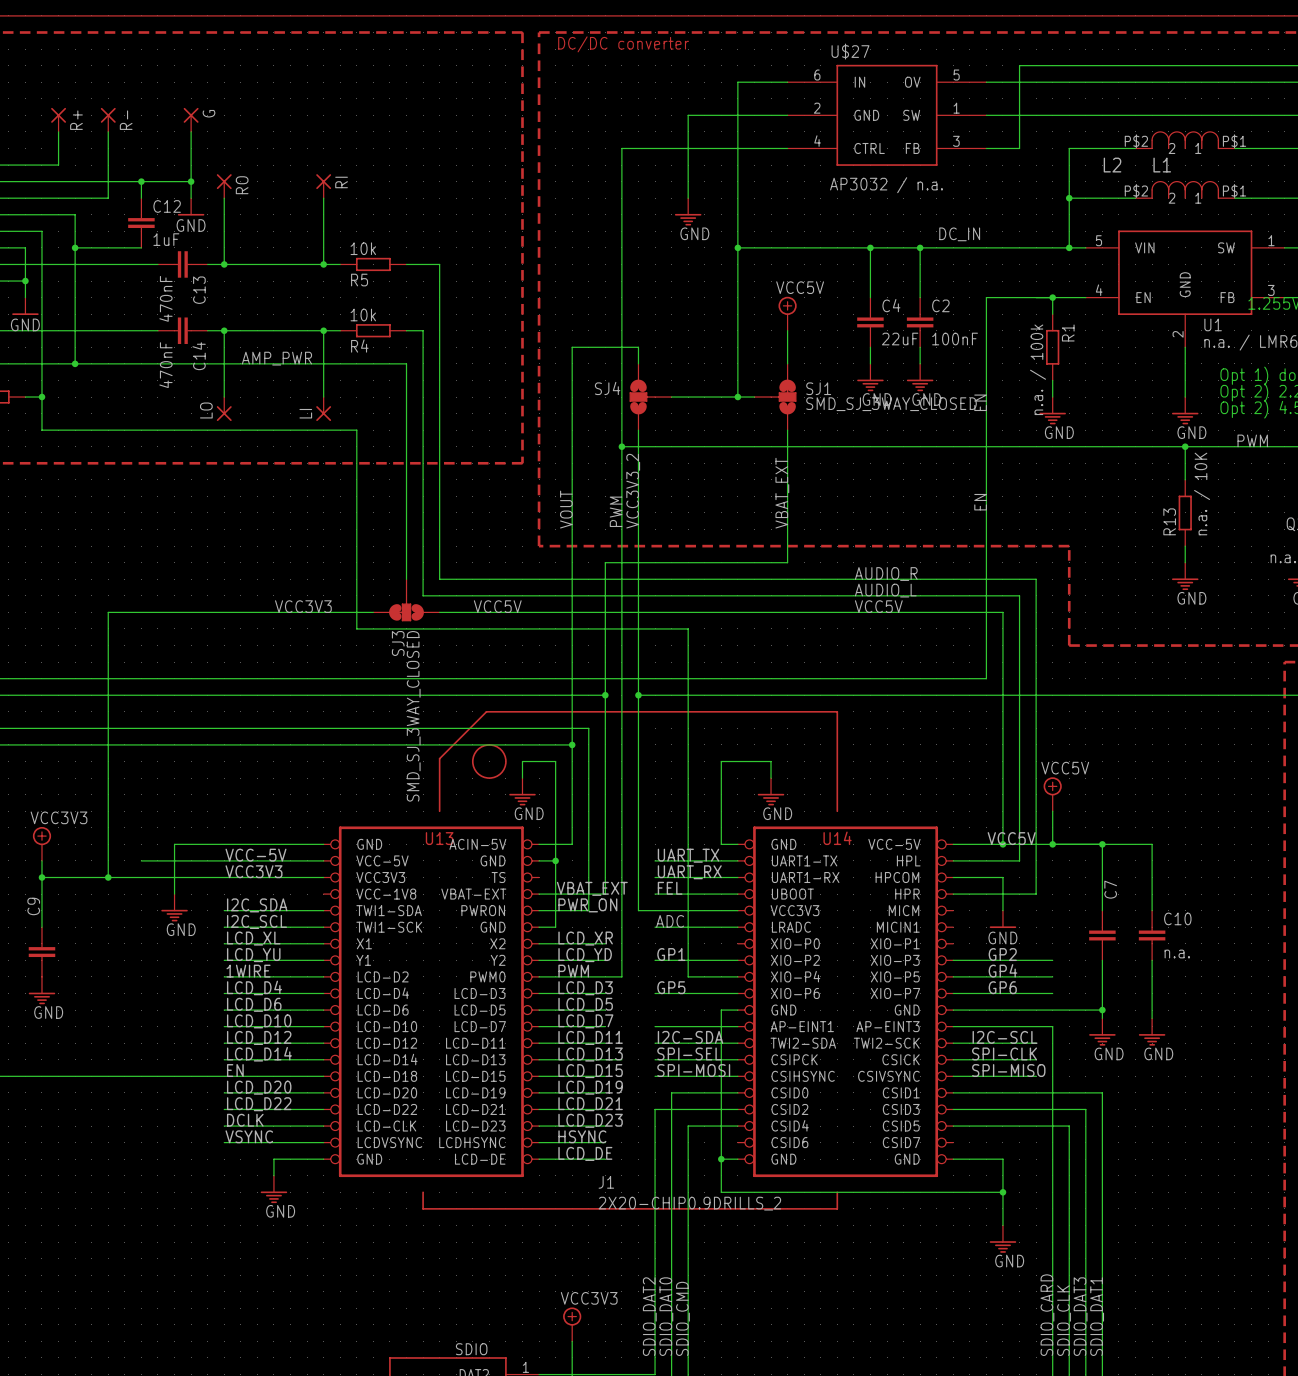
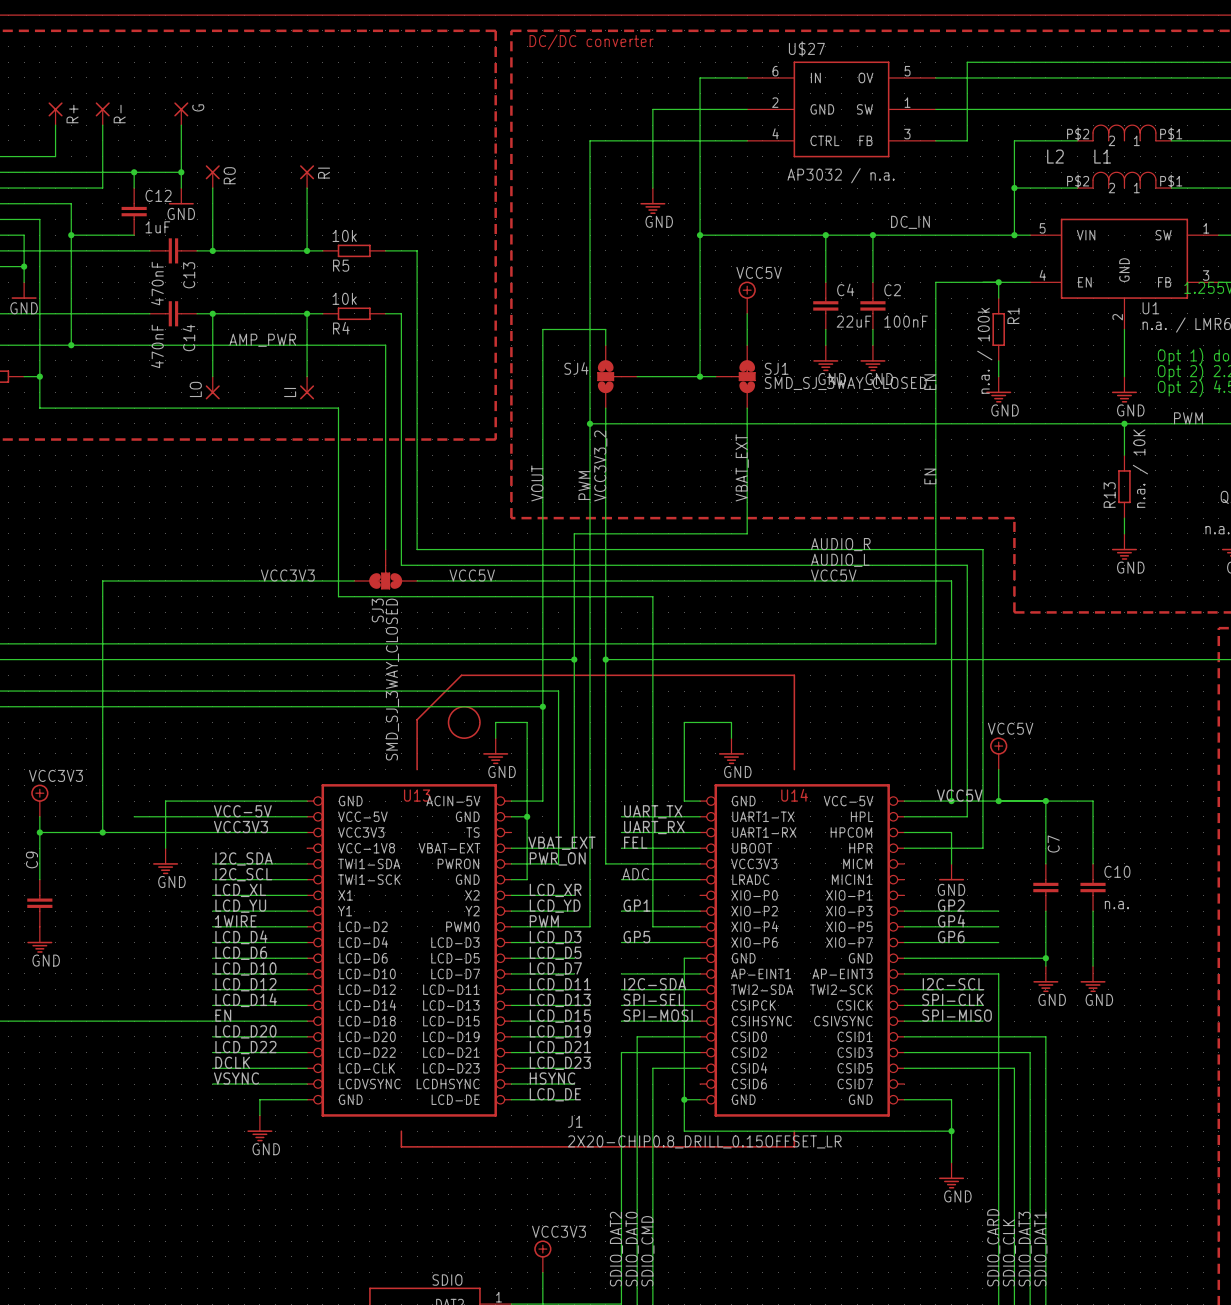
J1 value: 2X20-CHIP0.9DRILLS_2 (689, 1203) -> 2X20-CHIP0.8_DRILL_0.15OFFSET_LR (704, 1141)

